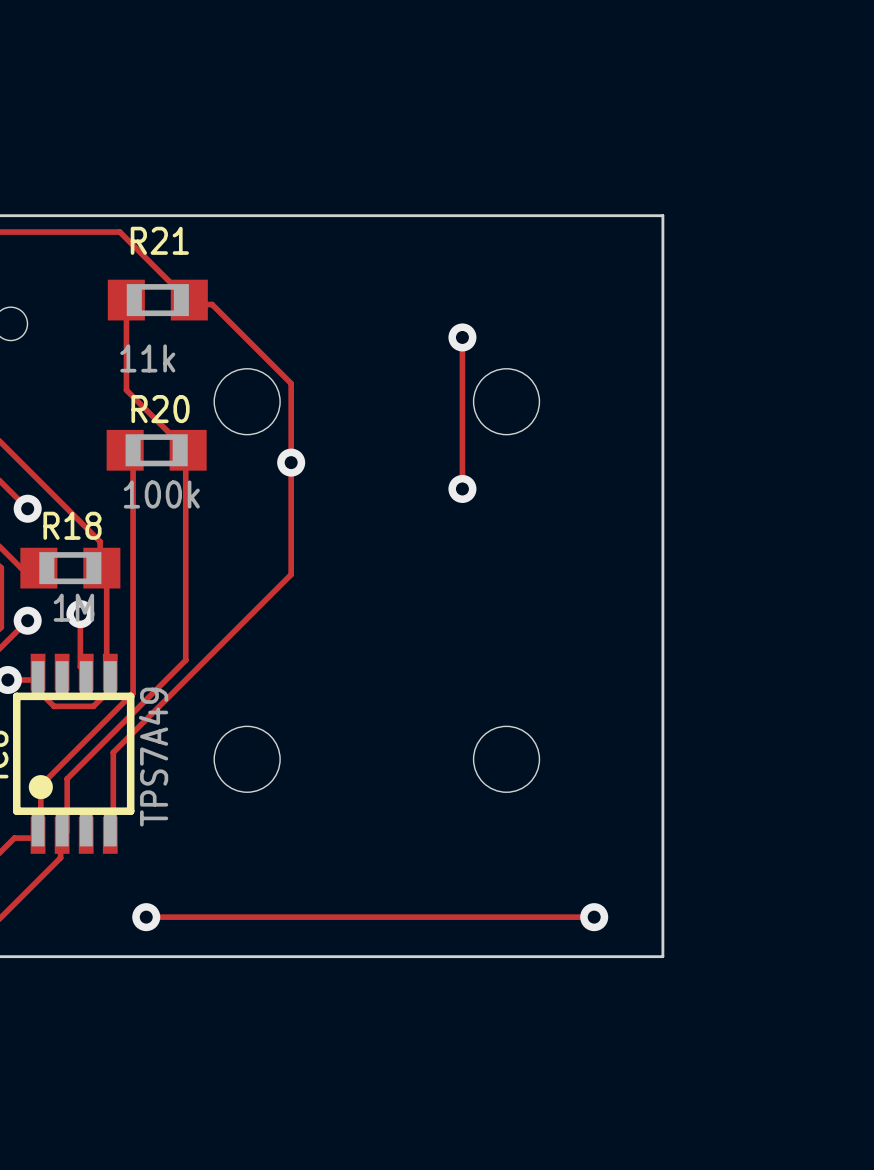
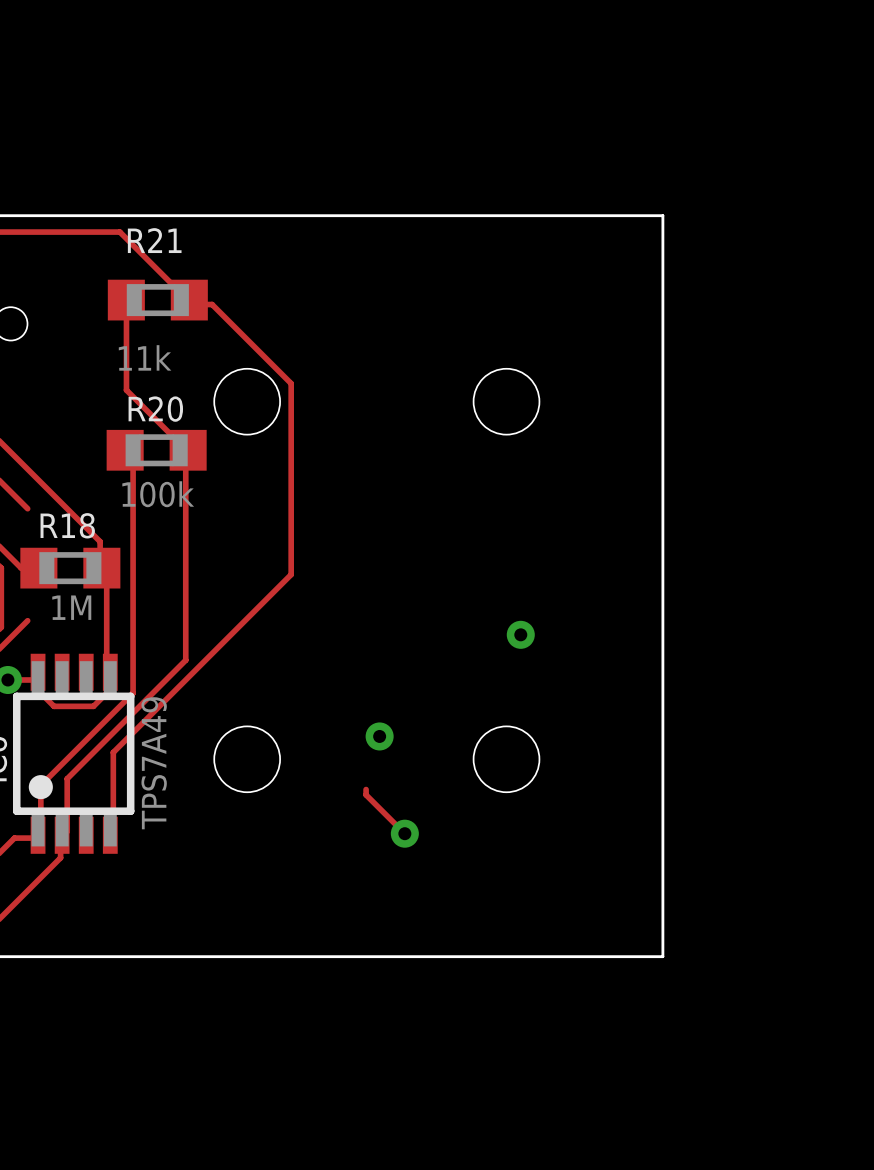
track: (462, 337) (462, 488) -> none
via: (462, 337) -> none
via: (291, 462) -> none
via: (462, 488) -> none
via: (27, 508) -> none
track: (80, 614) (80, 666) (86, 672) -> none
via: (80, 614) -> none
via: (27, 620) -> none
via: none -> (520, 634)
via: none -> (379, 736)
track: none -> (366, 789) (366, 794) (404, 833)
via: none -> (404, 833)
track: (146, 917) (594, 917) -> none
via: (146, 917) -> none
via: (594, 917) -> none

